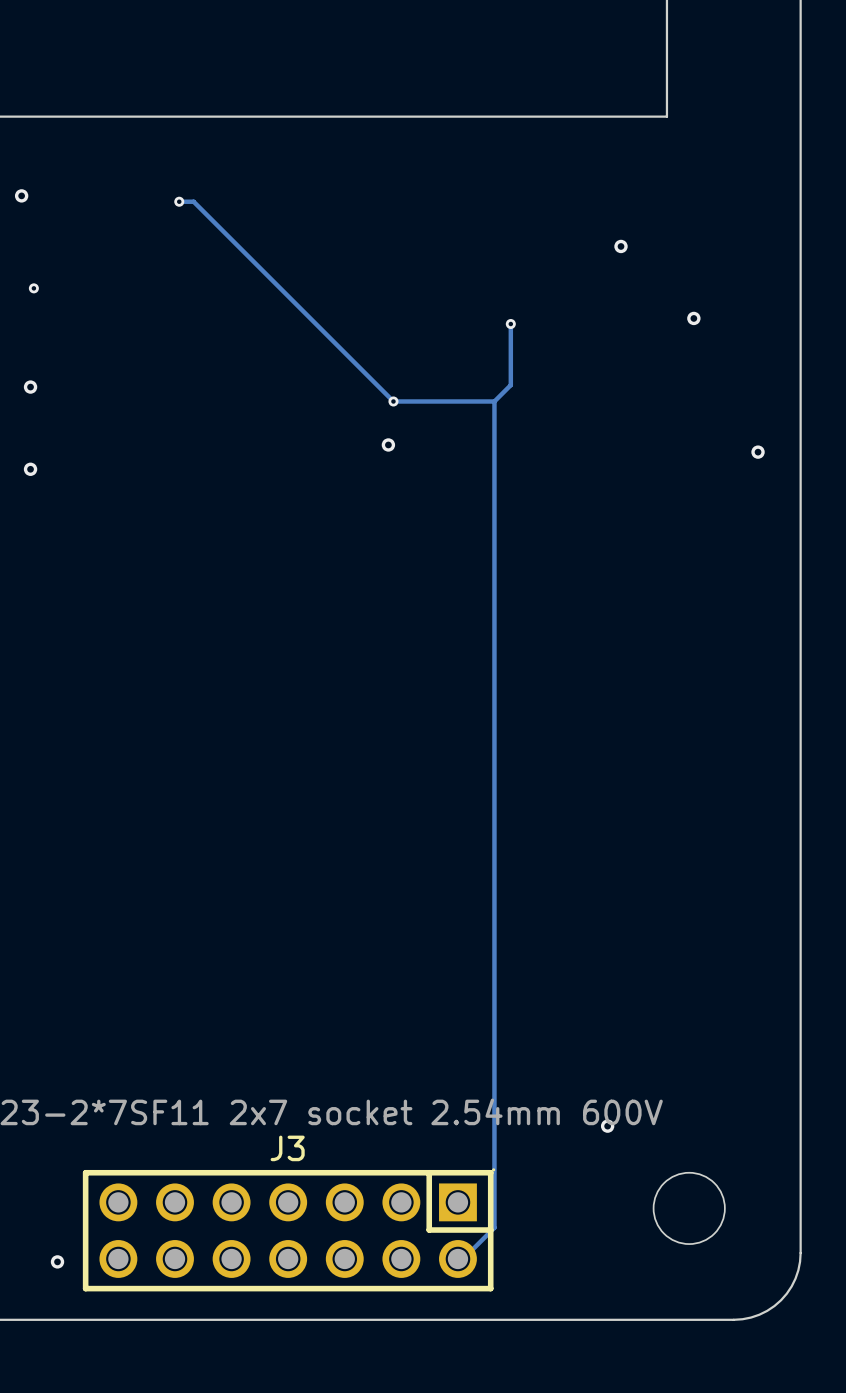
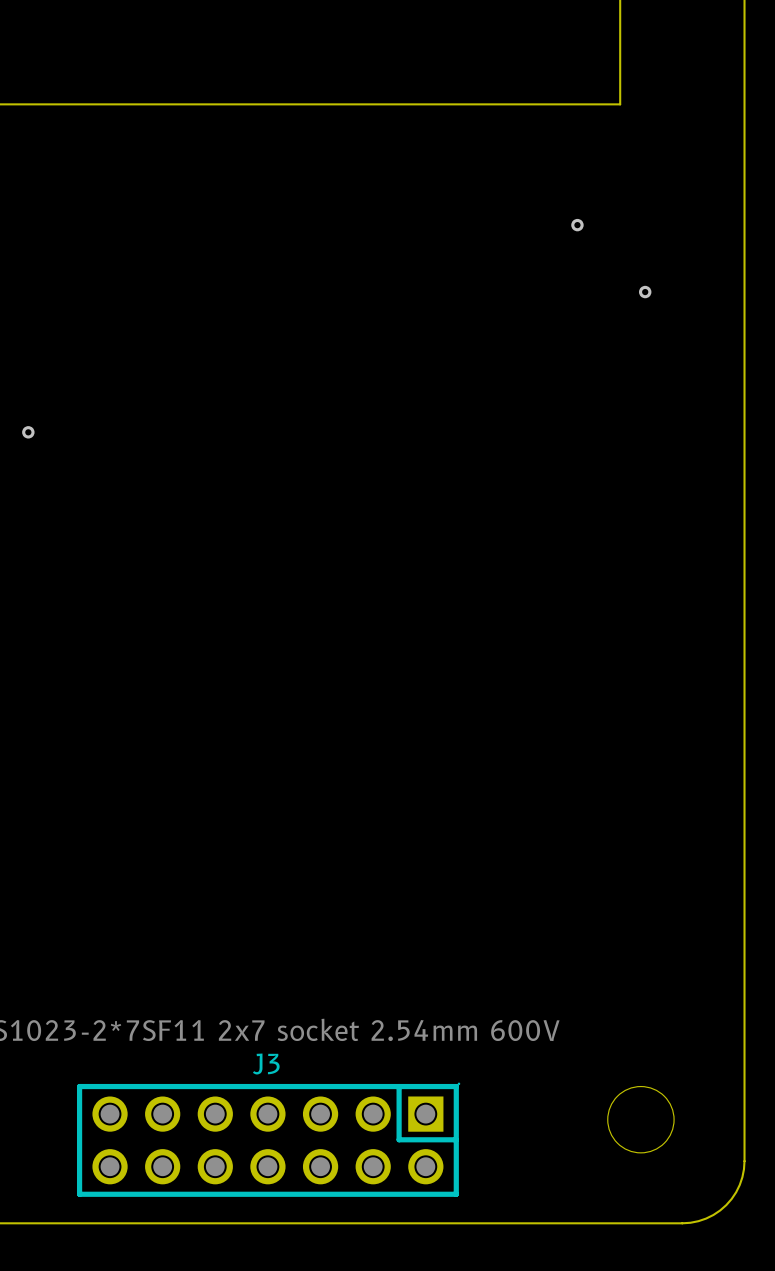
via: (21, 195) -> none
track: (179, 201) (193, 201) (393, 401) (494, 401) -> none
via: (179, 201) -> none
via: (33, 288) -> none
track: (510, 324) (510, 385) (494, 401) -> none
via: (510, 324) -> none
via: (30, 387) -> none
via: (393, 401) -> none
track: (494, 401) (494, 1227) (463, 1258) (457, 1258) -> none
via: (388, 444) -> none
via: (758, 452) -> none
via: (607, 1126) -> none
via: (57, 1261) -> none

